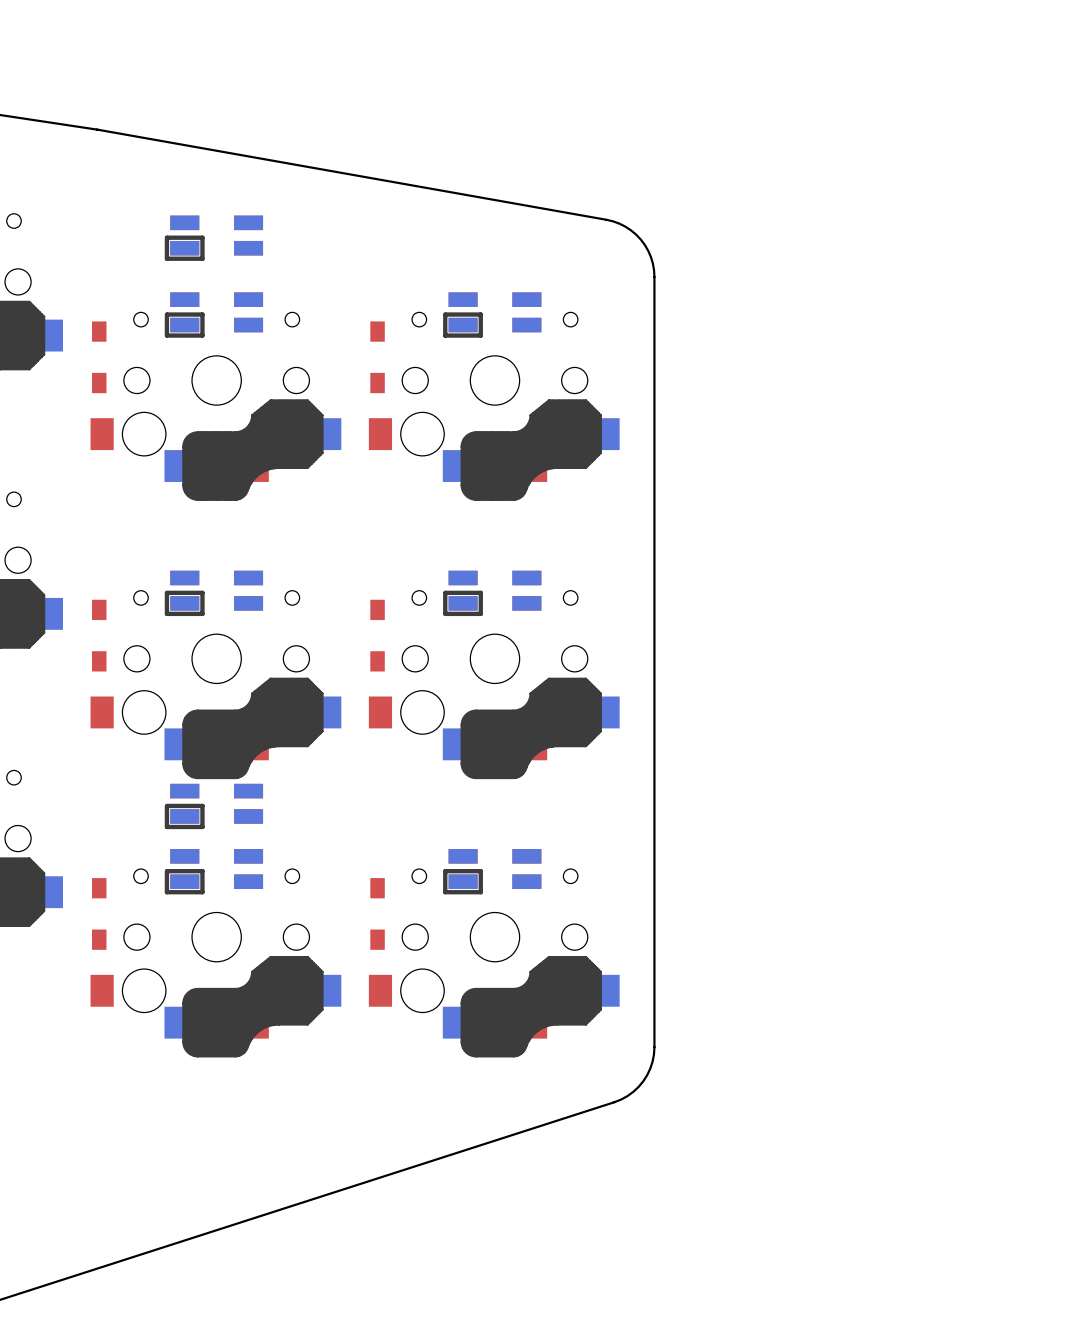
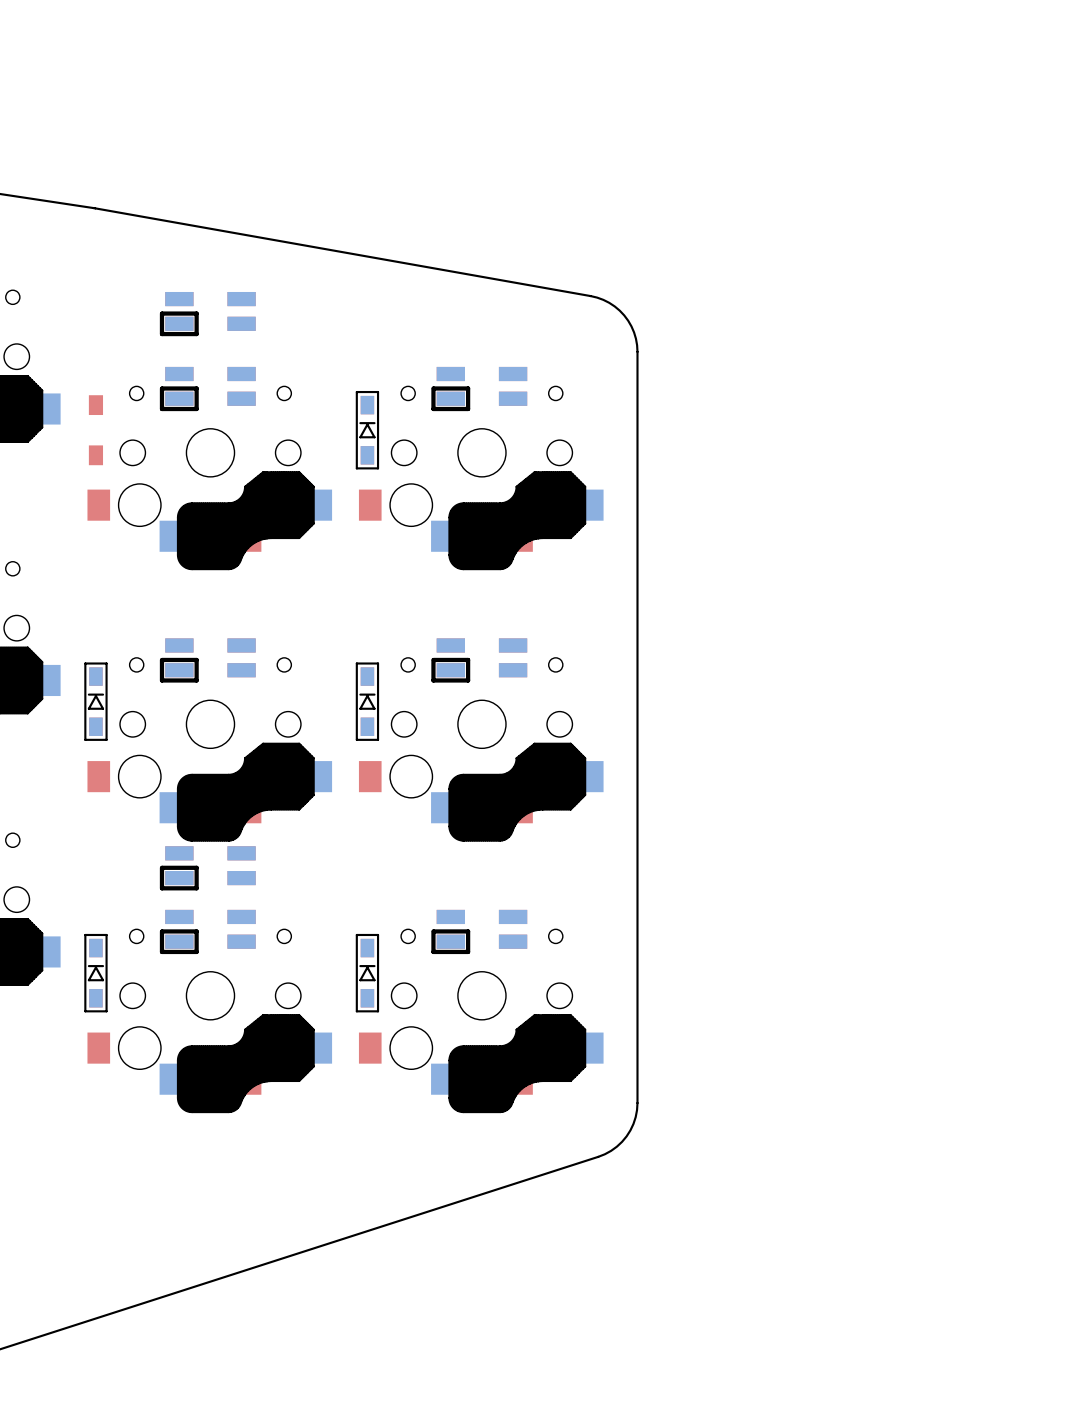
part footprint: [370, 321, 385, 394] -> [355, 390, 380, 470]
part footprint: [91, 599, 107, 672] -> [84, 662, 108, 741]
part footprint: [370, 599, 385, 672] -> [355, 662, 380, 741]
part footprint: [91, 878, 107, 950] -> [84, 933, 108, 1013]
part footprint: [370, 878, 385, 950] -> [355, 933, 380, 1013]

